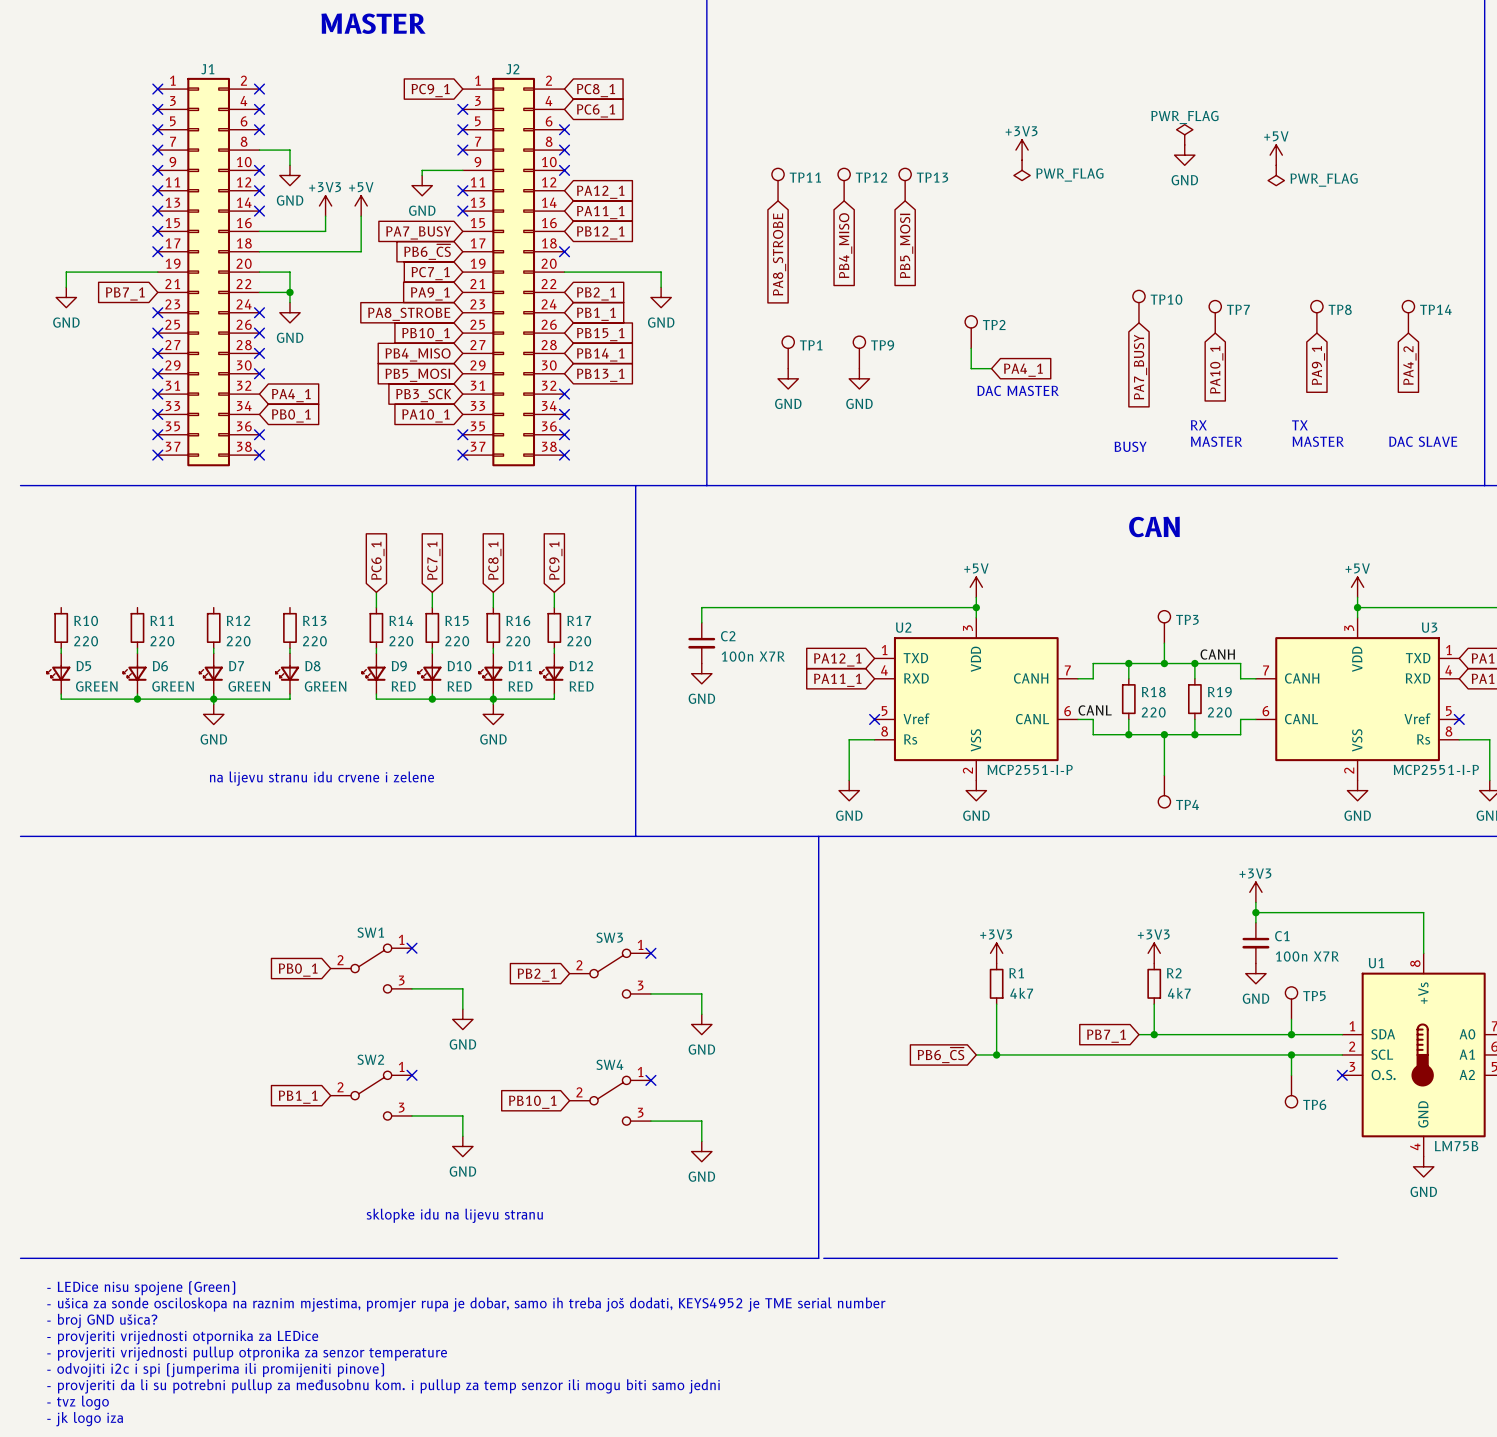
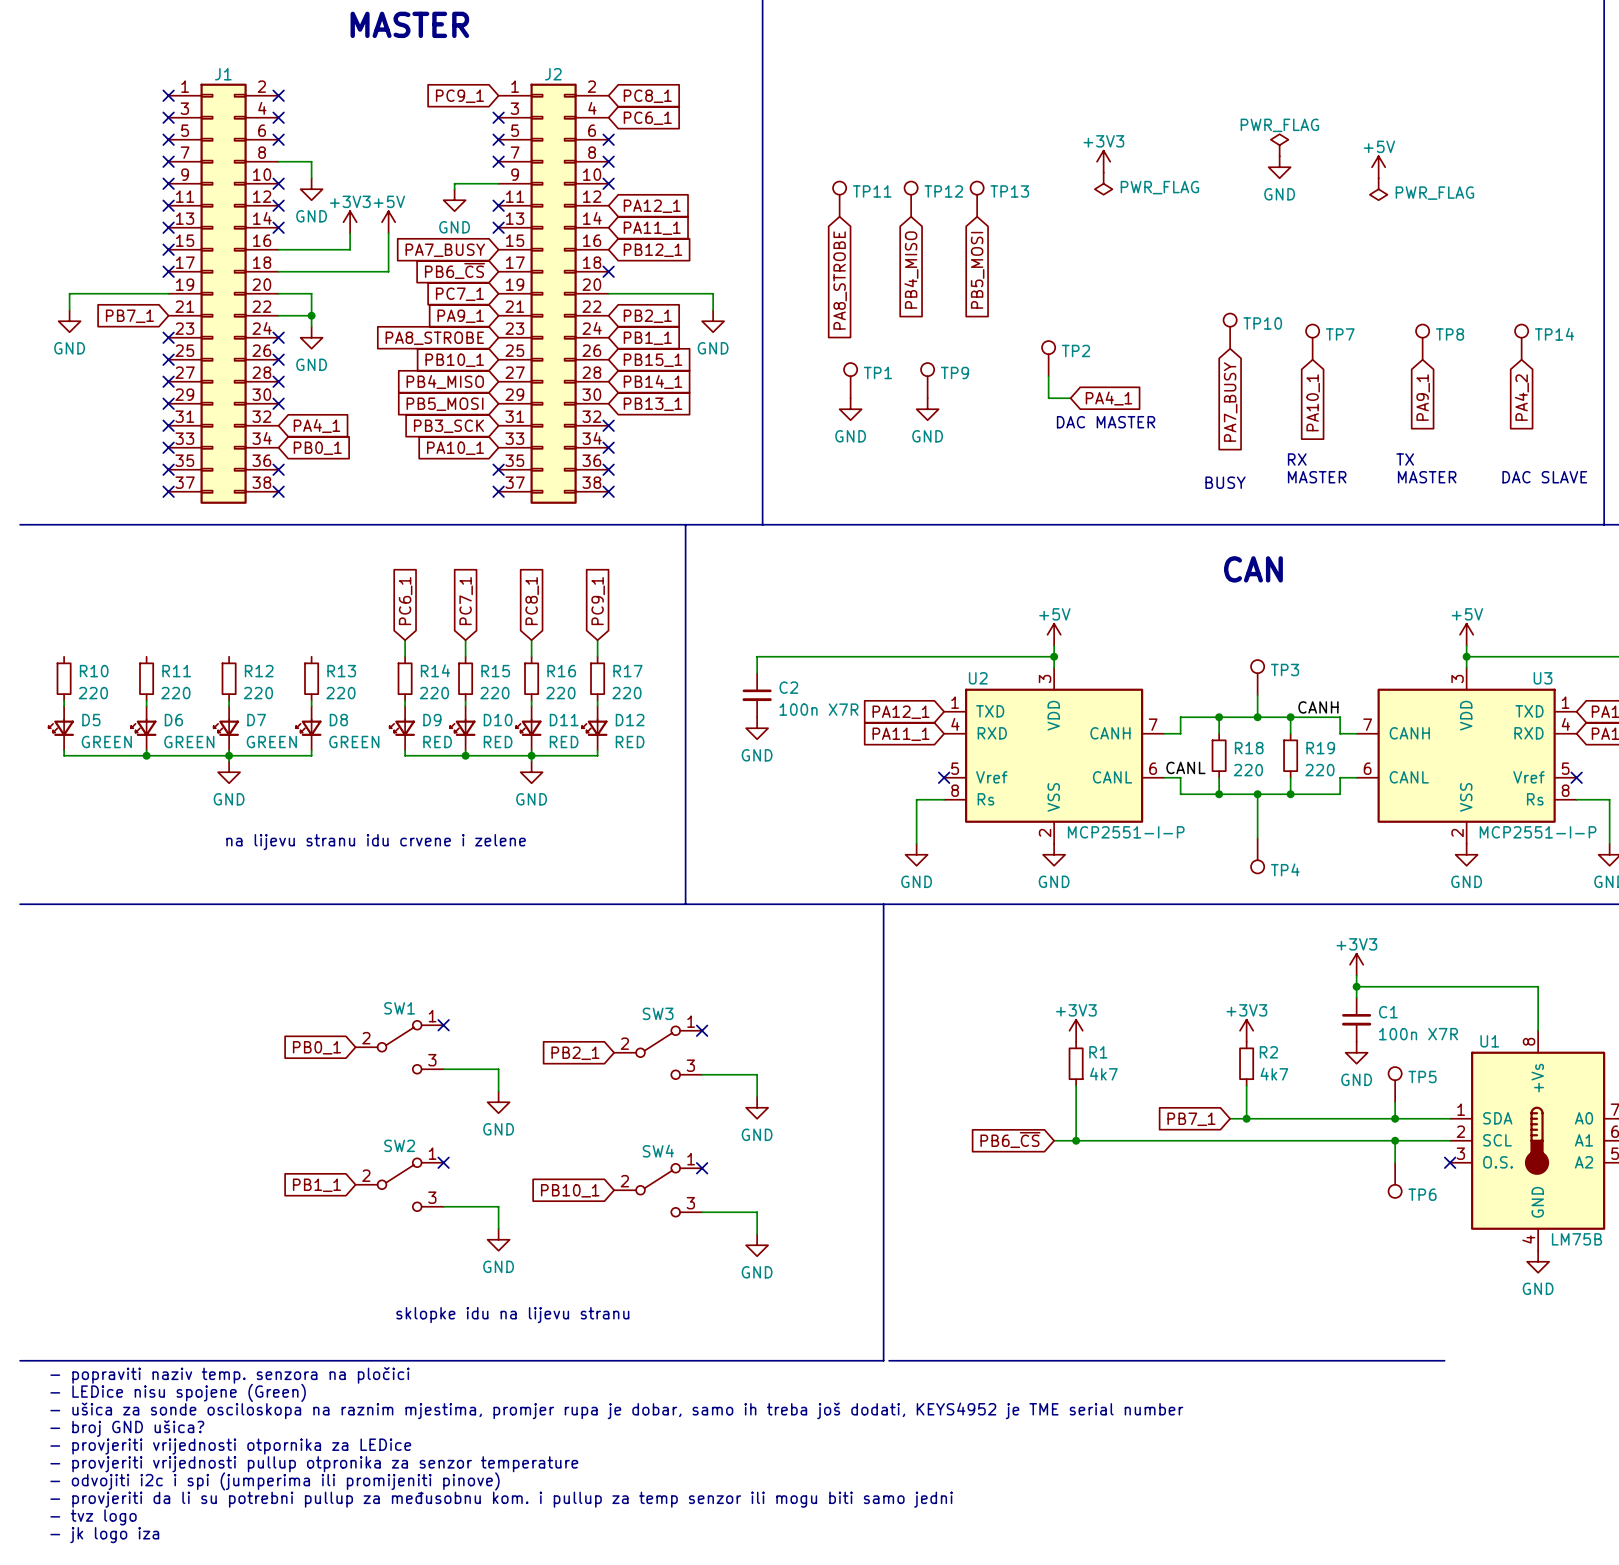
text: none -> - popraviti naziv temp. senzora na pločici (229, 1375)

